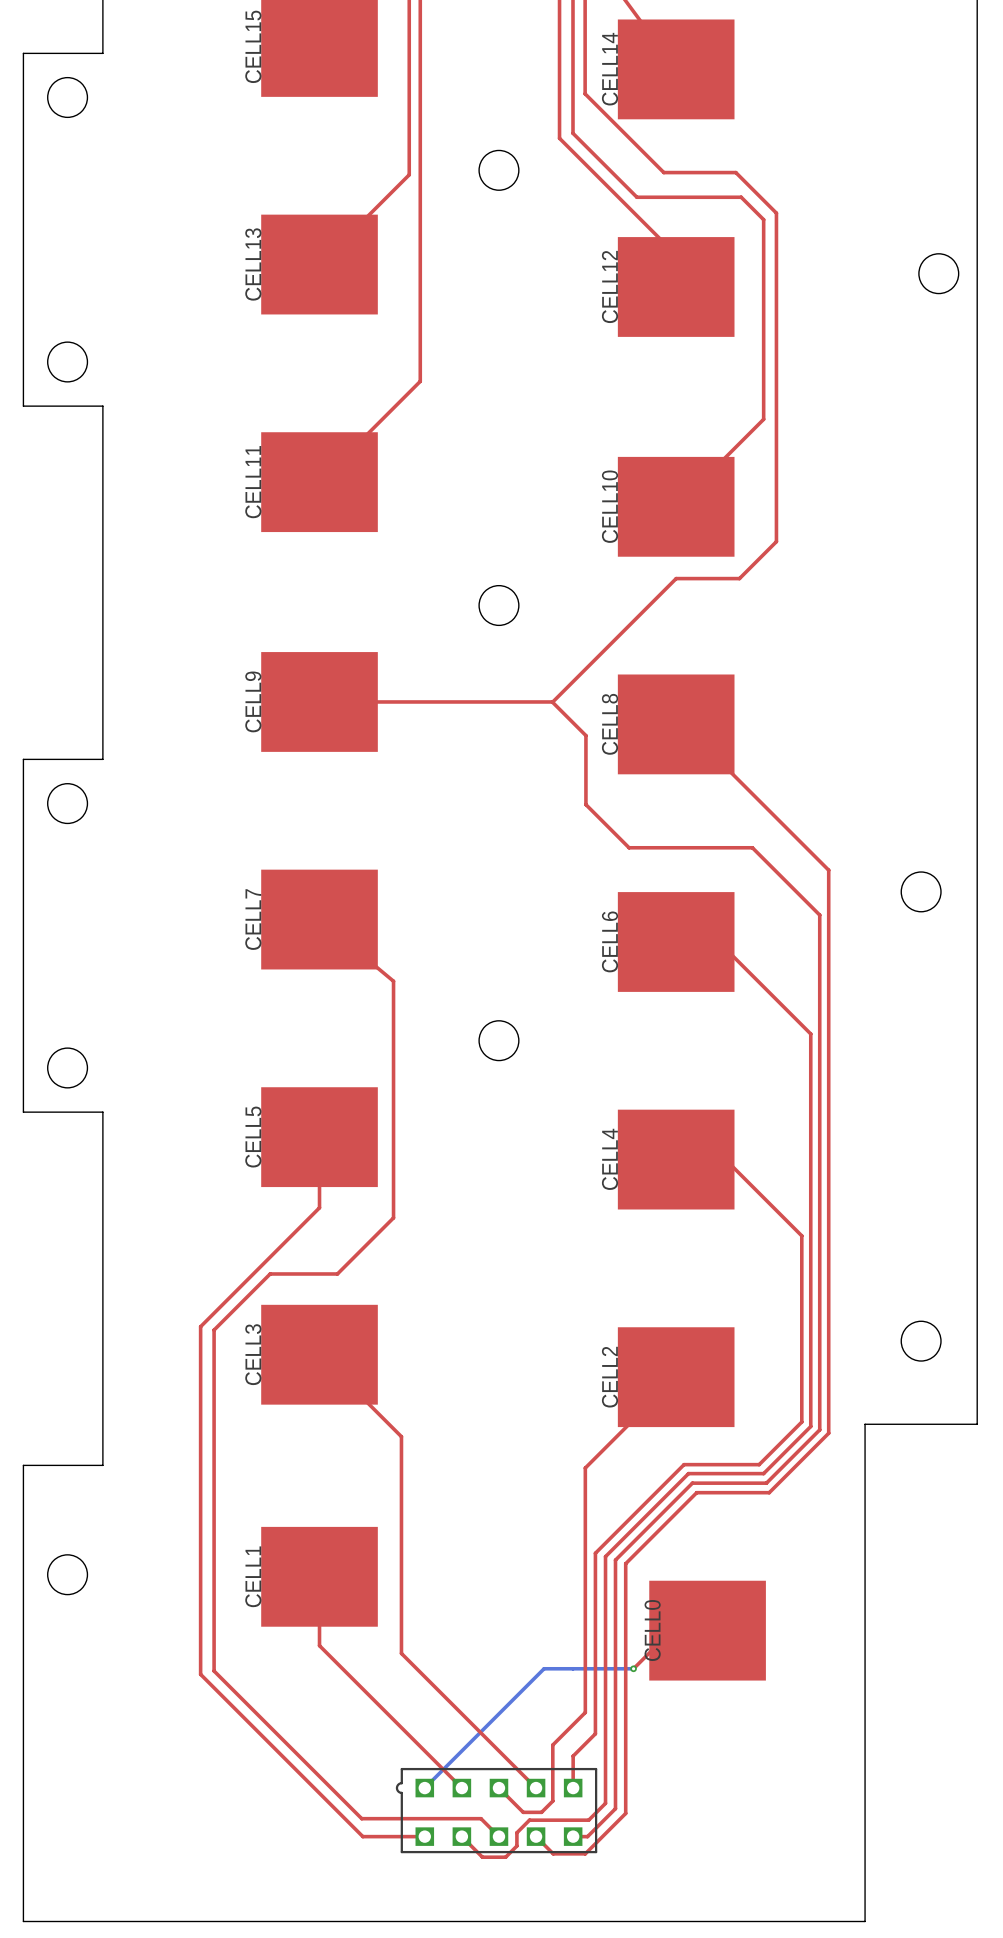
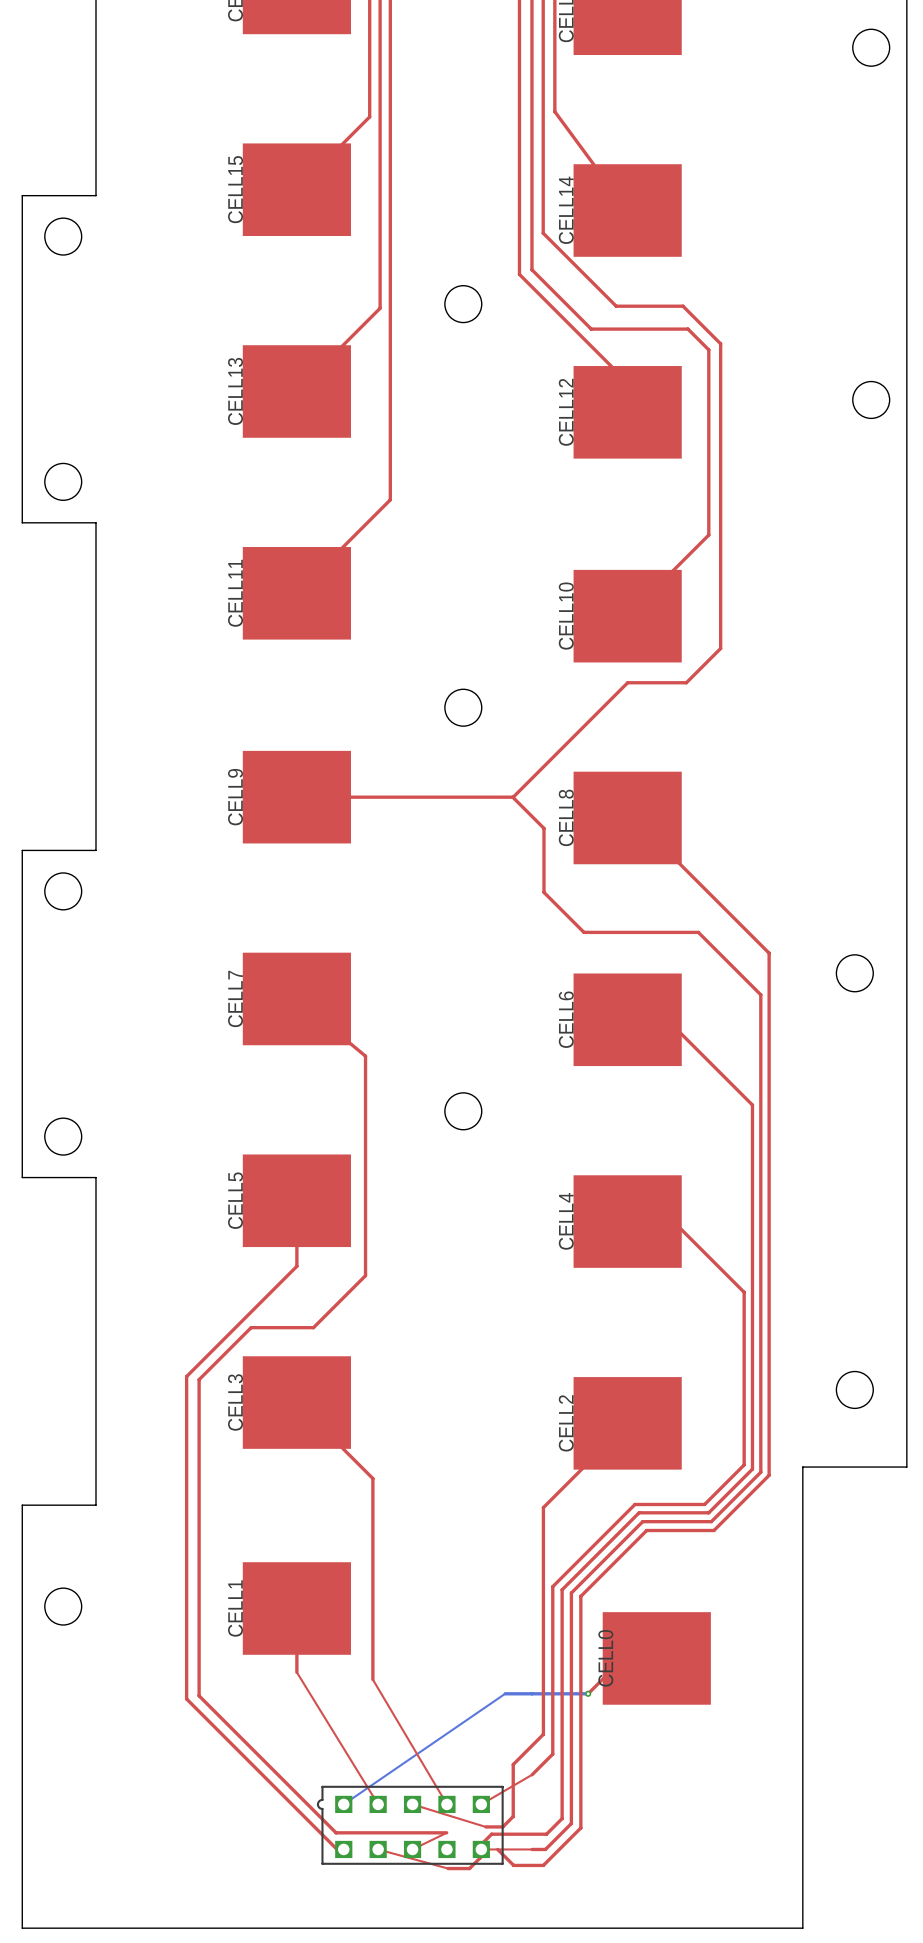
top track: (319, 1645) (461, 1788) -> (296, 1672) (378, 1804)
top track: (401, 1653) (536, 1788) -> (372, 1679) (446, 1804)
bottom track: (544, 1668) (424, 1788) -> (505, 1693) (343, 1804)
top track: (573, 1756) (573, 1788) -> (532, 1774) (481, 1804)
top track: (498, 1788) (523, 1812) -> (412, 1804) (485, 1826)
part position: (496, 1810) -> (410, 1825)
top track: (481, 1818) (498, 1836) -> (446, 1832) (412, 1849)
top track: (370, 1836) (424, 1836) -> (481, 1849) (532, 1849)
top track: (461, 1836) (482, 1857) -> (378, 1849) (448, 1868)

